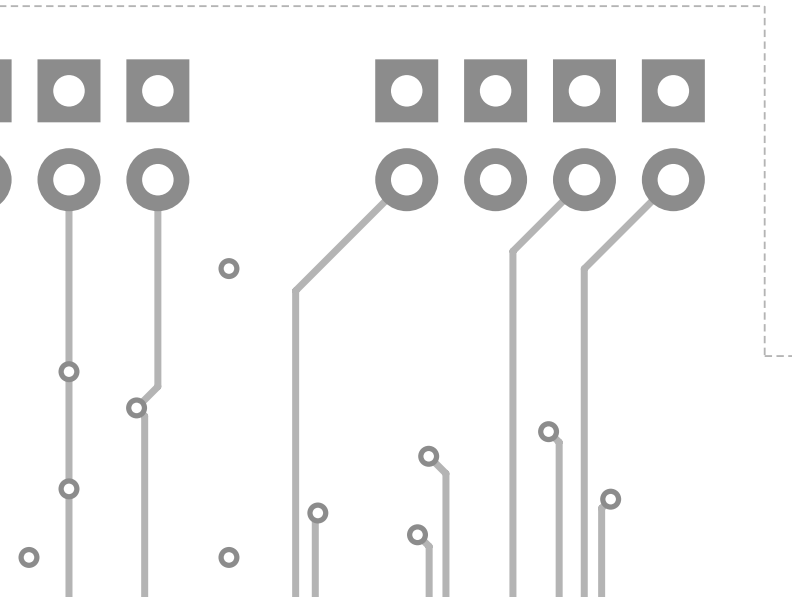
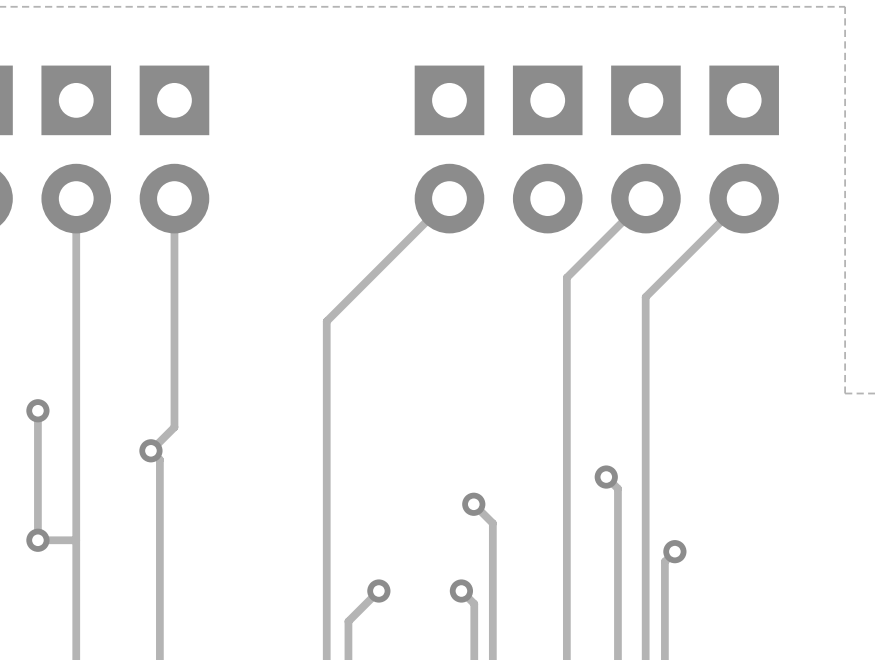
via: (228, 268) -> none
track: none -> (37, 410) (37, 540) (76, 540)
via position: (68, 371) -> (37, 410)
via: none -> (37, 540)
via: (68, 488) -> none
track: (317, 512) (315, 515) (315, 562) -> (378, 591) (348, 621)
via position: (317, 512) -> (378, 591)
via: (28, 557) -> none
via: (228, 557) -> none

